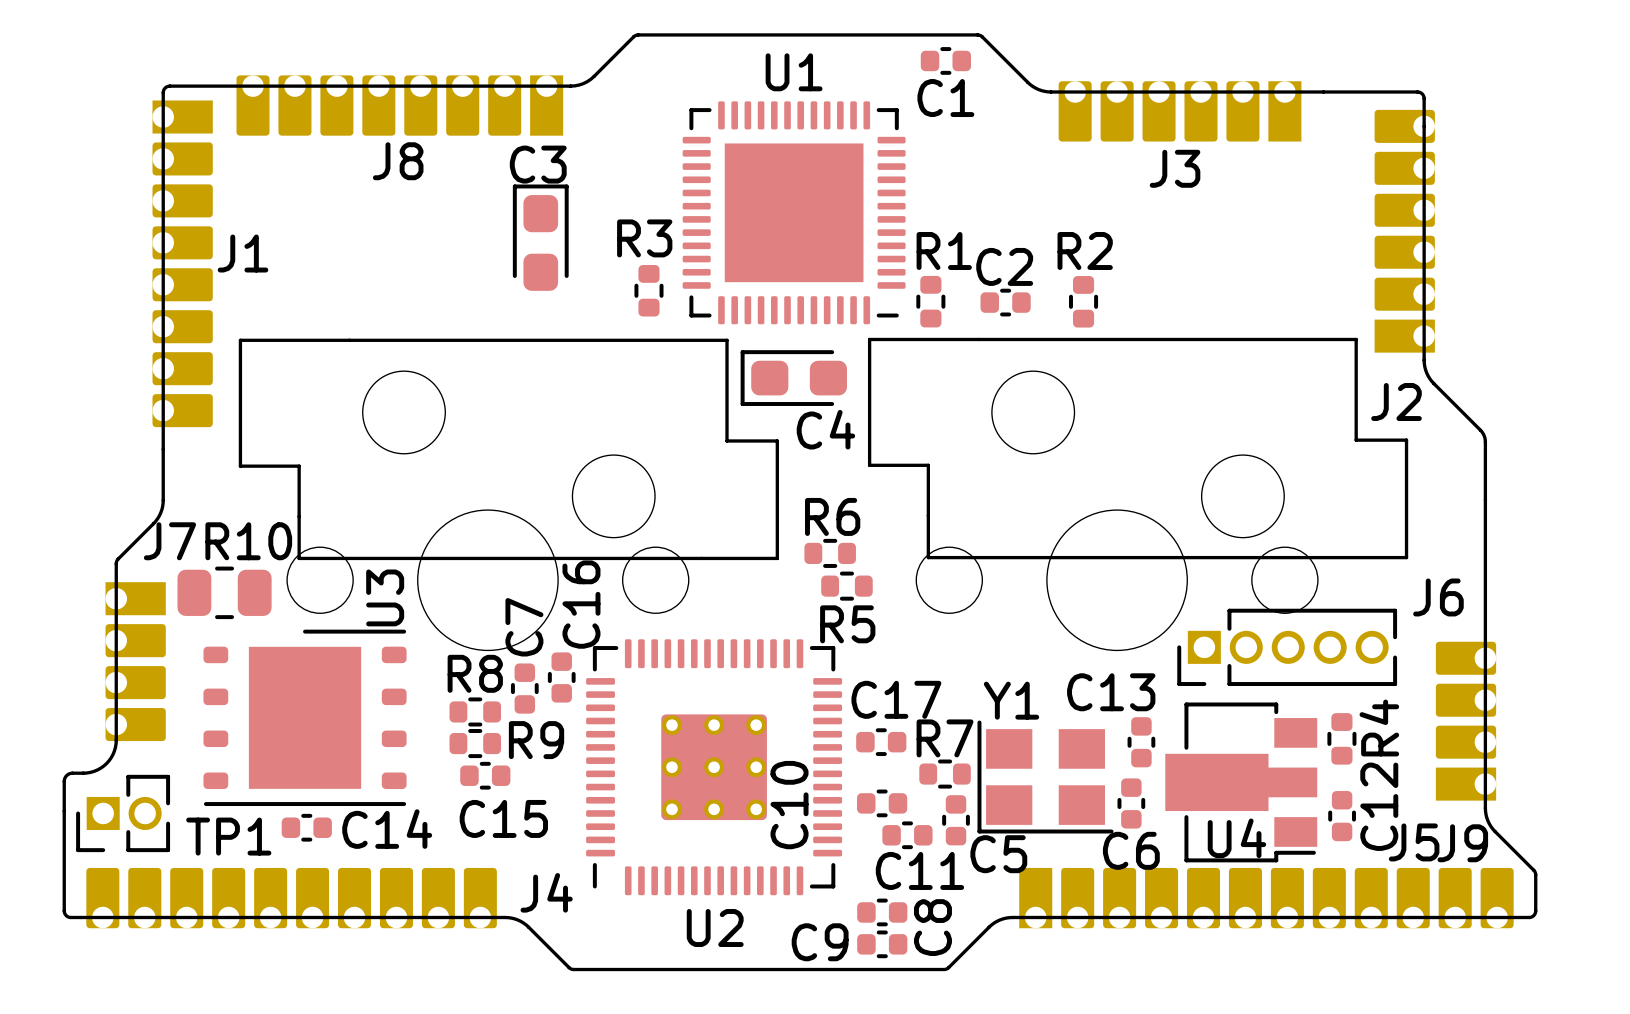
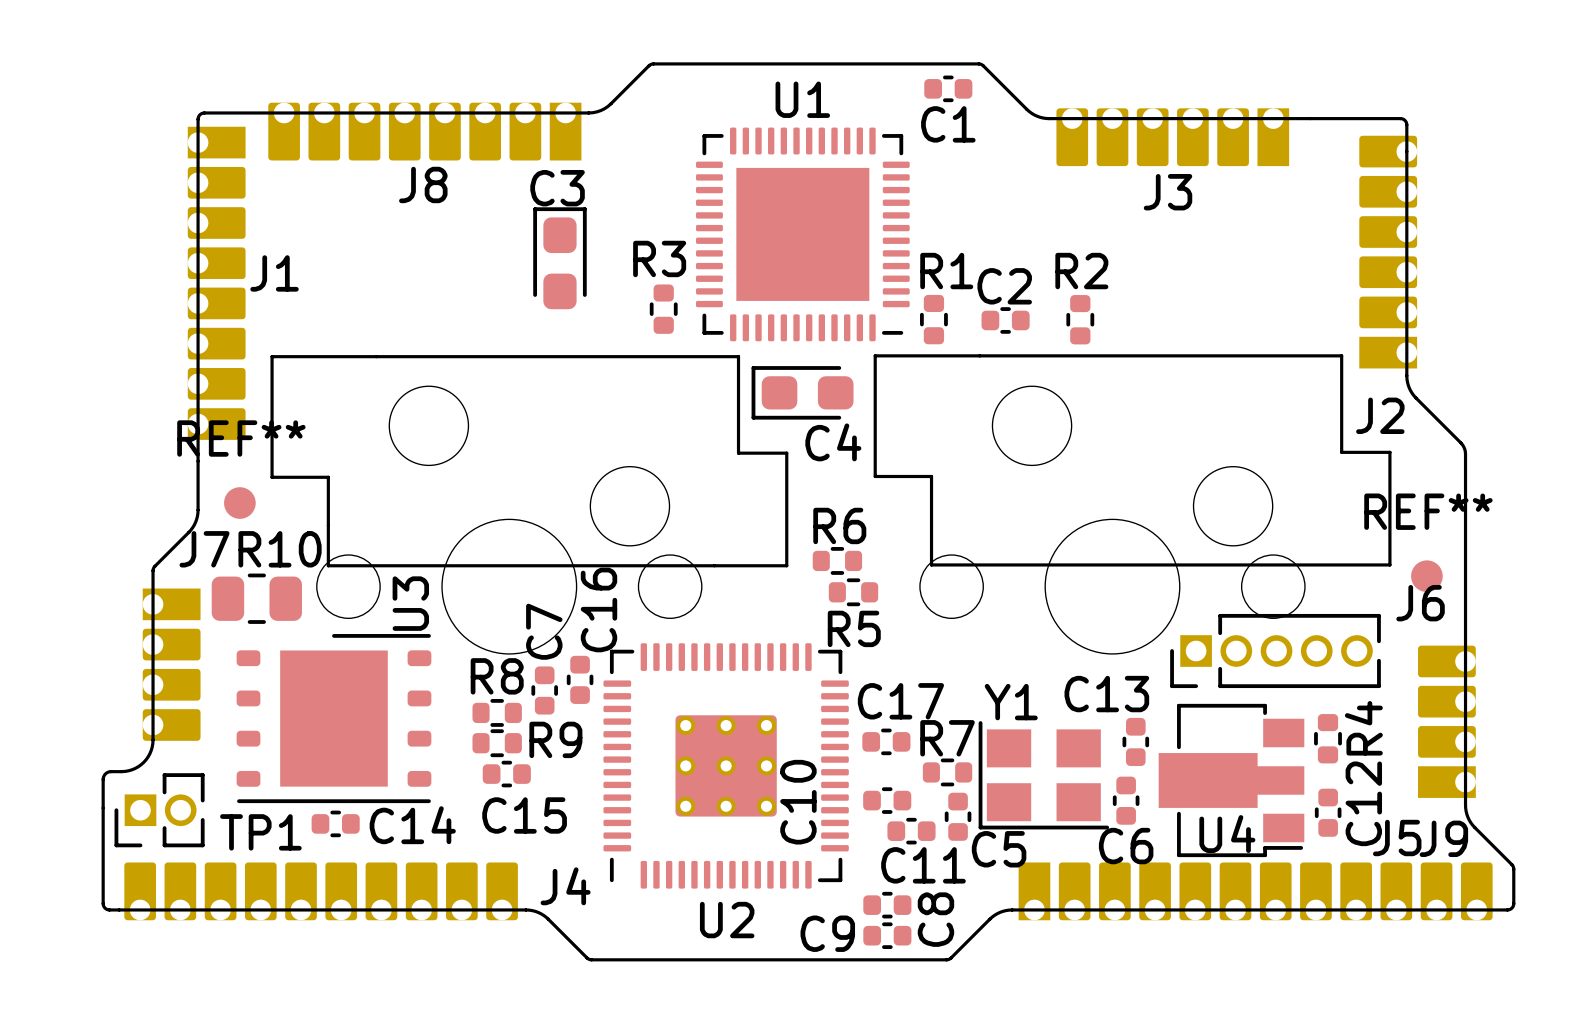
REF**: none -> (239, 503)
REF**: none -> (1426, 576)

